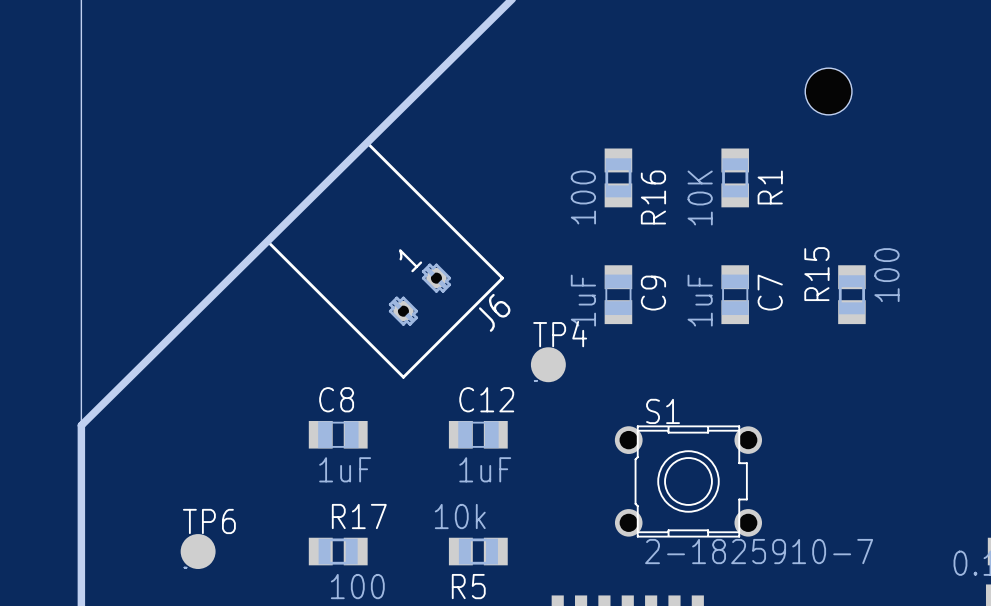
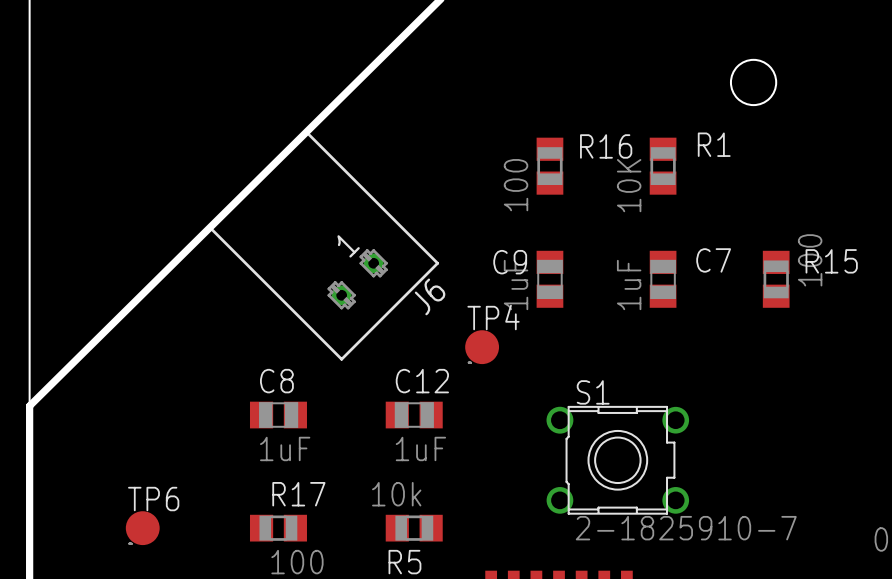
R1 name rotation: 0° (770, 187) -> 90° clockwise (714, 144)
R16 name rotation: 0° (653, 197) -> 90° clockwise (606, 146)
R15 name rotation: 0° (816, 274) -> 90° clockwise (831, 261)
R15 name position: R15 (816, 274) -> R15 (831, 261)
C7 name rotation: 0° (770, 292) -> 90° clockwise (713, 260)
C9 name rotation: 0° (653, 293) -> 90° clockwise (510, 262)
C9 name position: C9 (653, 293) -> C9 (510, 262)

